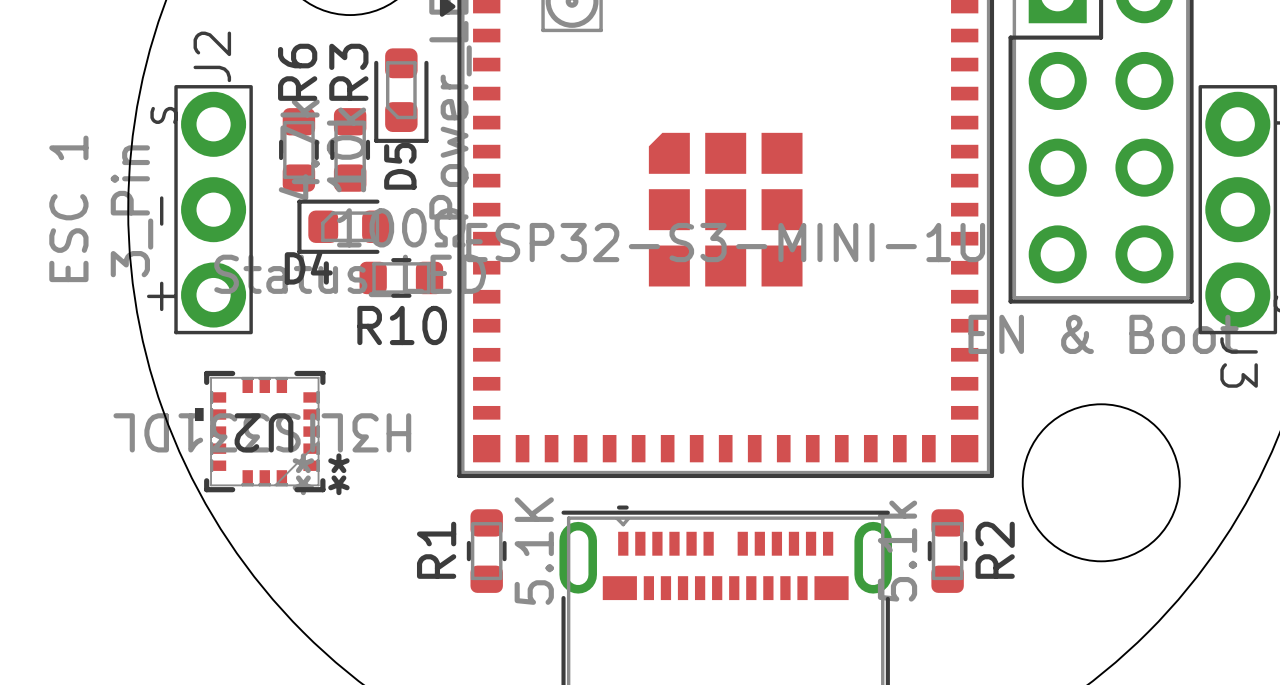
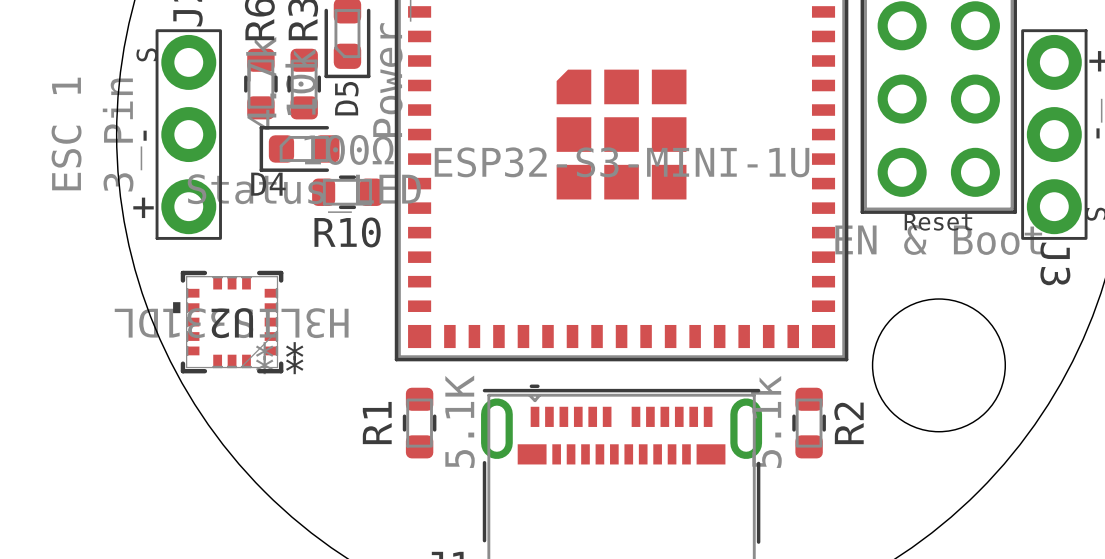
text: none -> Reset (938, 221)

